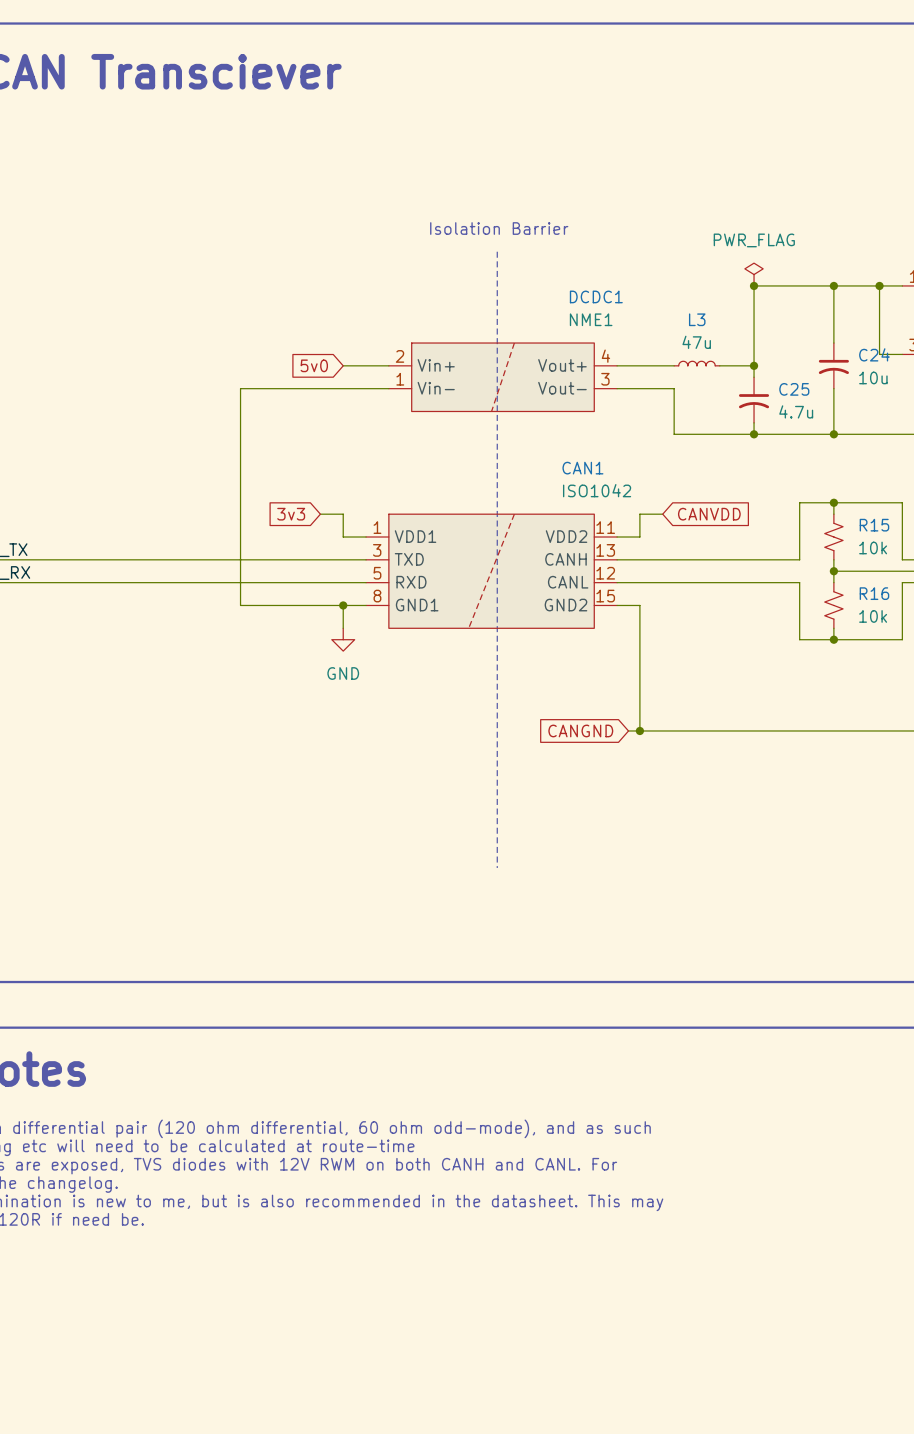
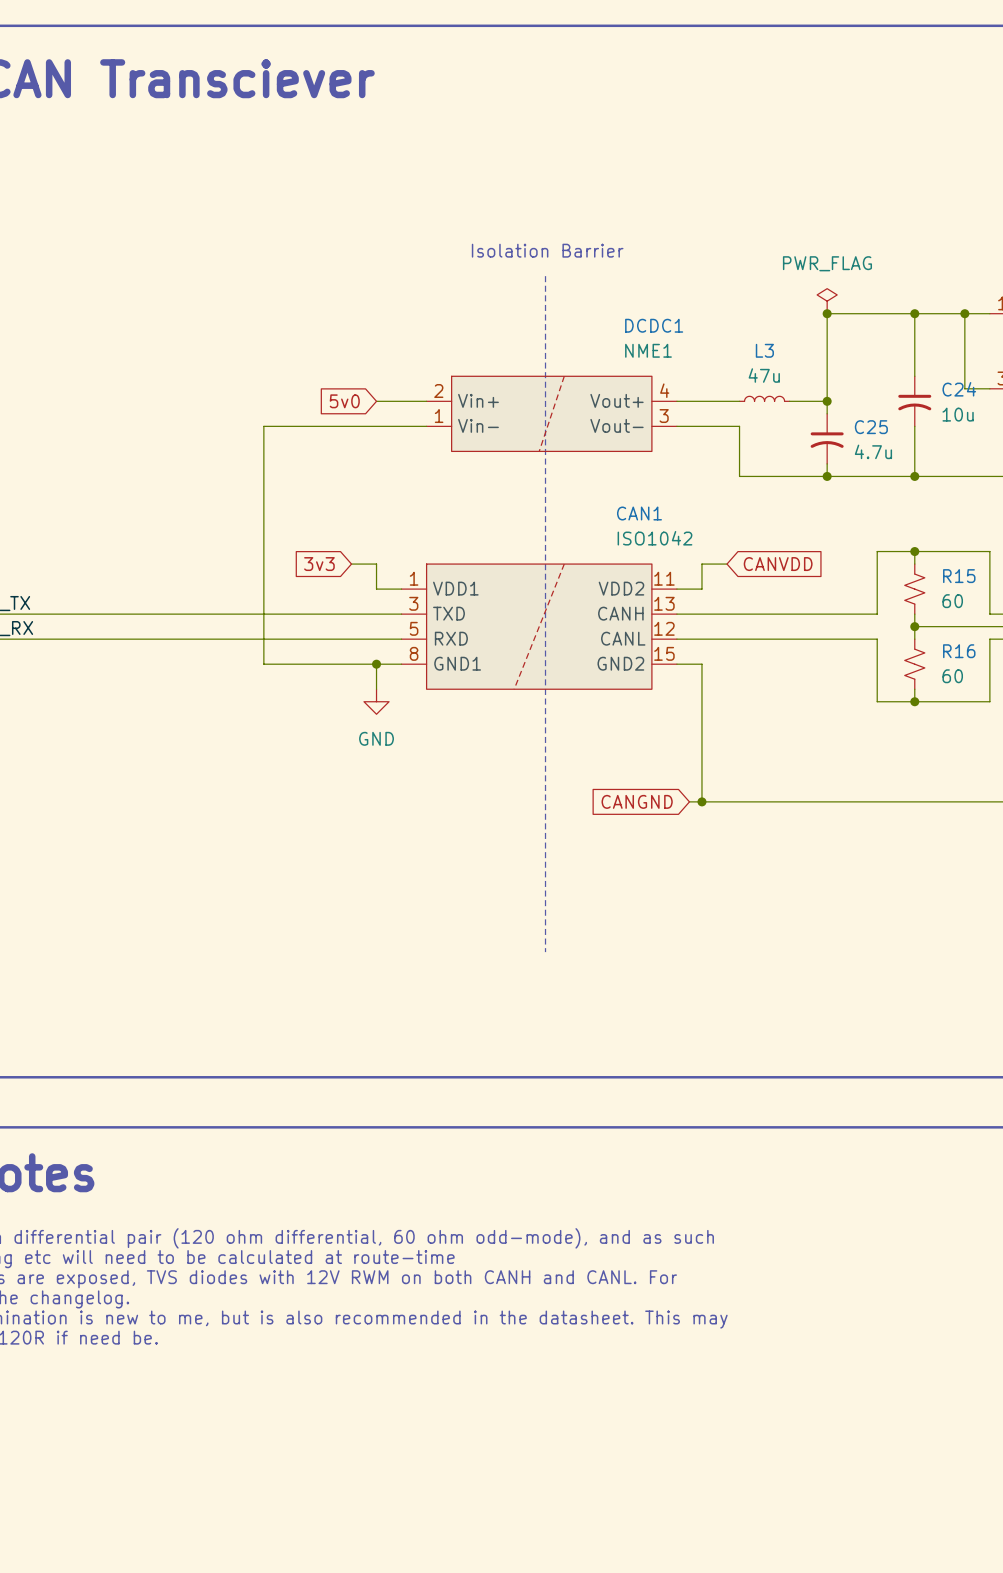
R15 value: 10k (873, 547) -> 60 (952, 601)
R16 value: 10k (873, 616) -> 60 (952, 676)

